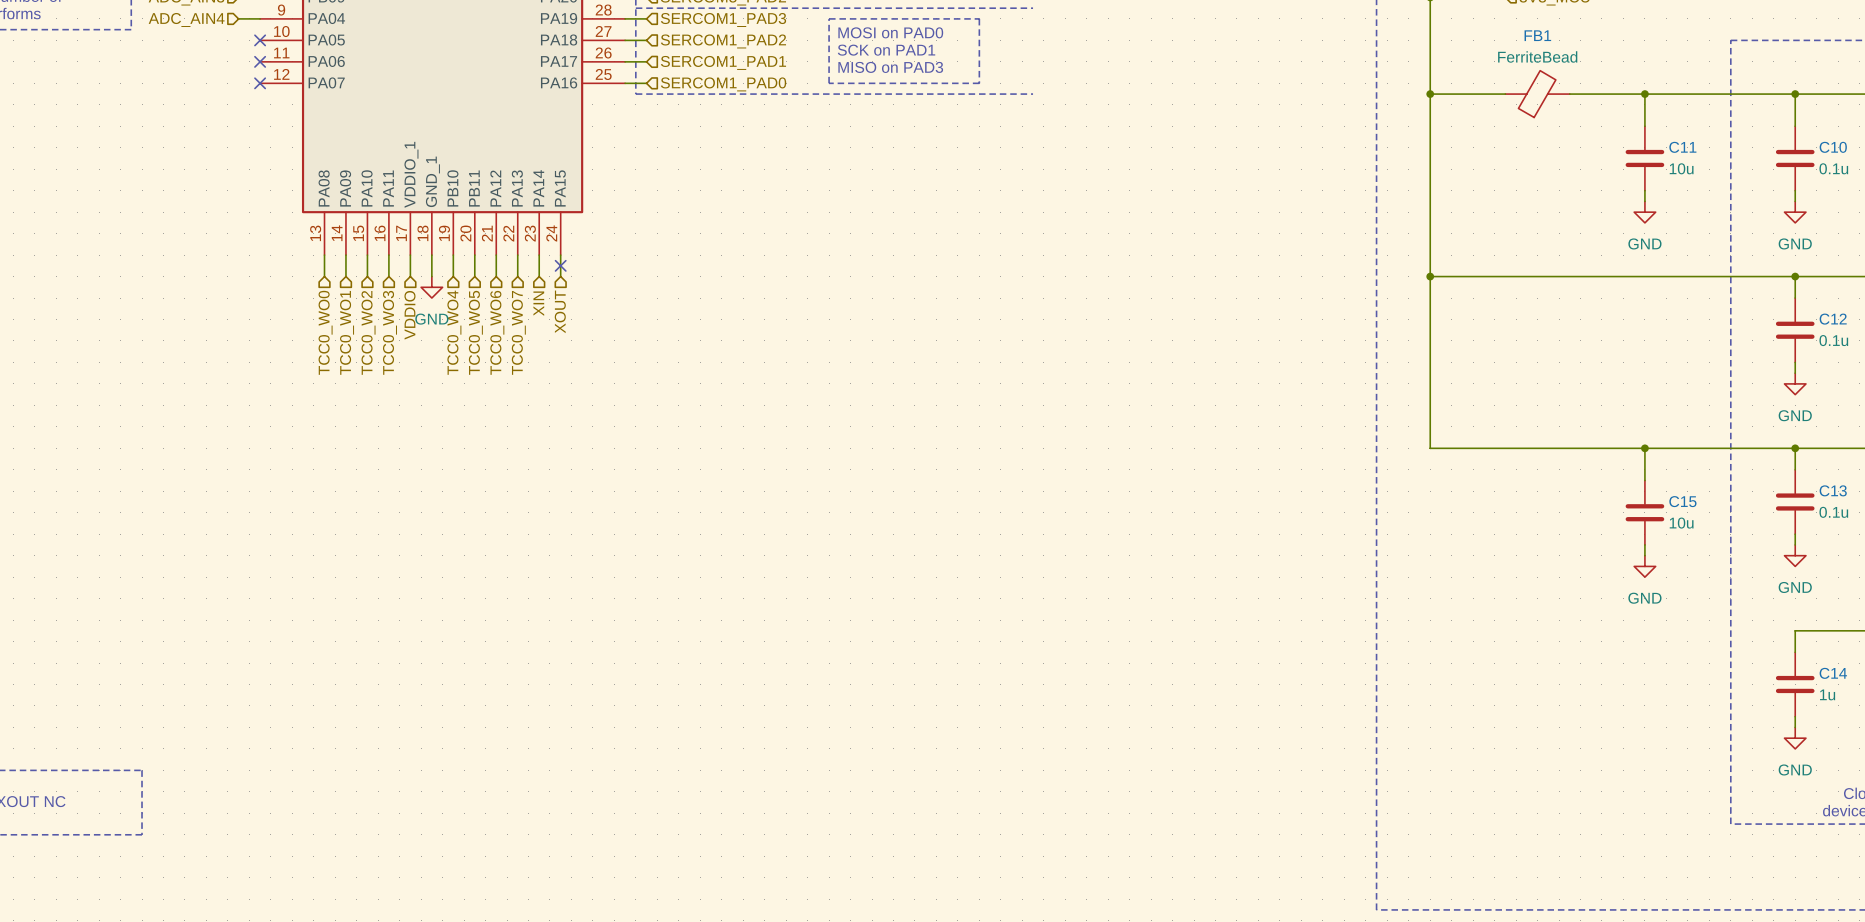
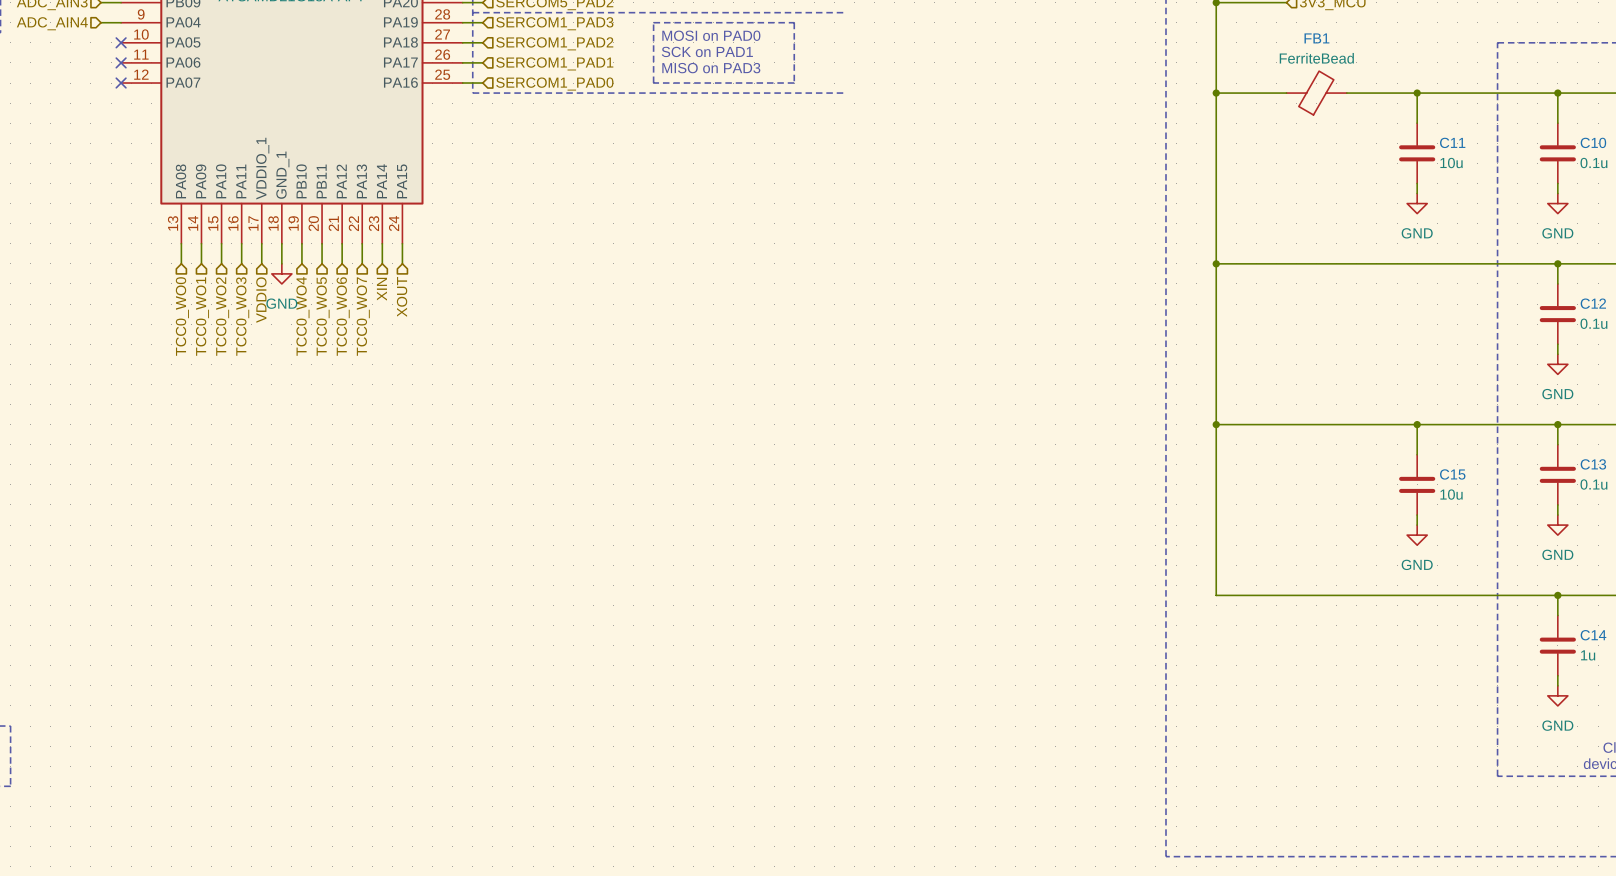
no-connect mark: (560, 265) -> none
wire: none -> (1216, 424) (1216, 595) (1557, 595)
junction: none -> (1216, 424)
junction: none -> (1557, 595)

